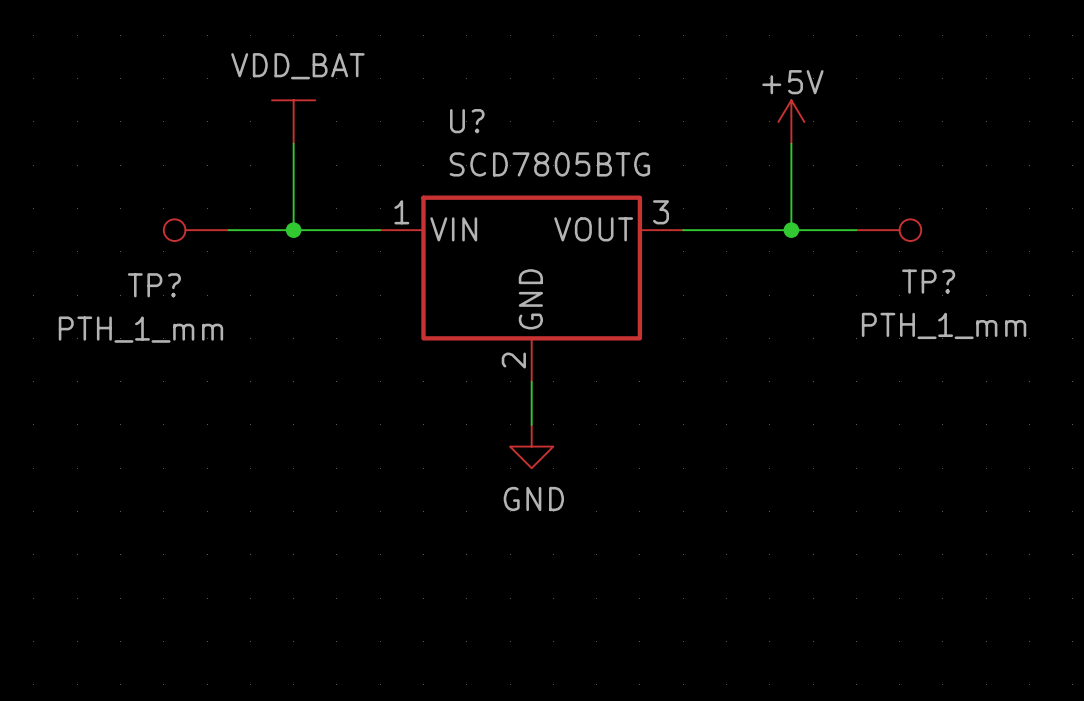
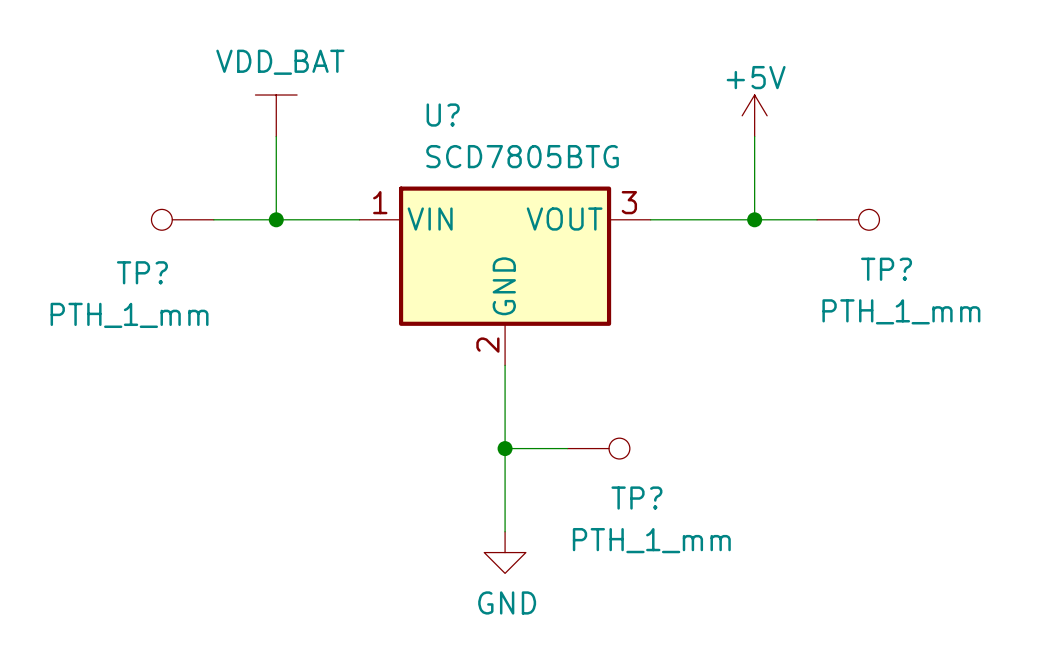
wire: none -> (505, 406) (505, 531)
power symbol position: GND (531, 446) -> GND (505, 552)
wire: none -> (505, 448) (567, 448)
junction: none -> (505, 448)
TP?: none -> PTH_1_mm (598, 448)

